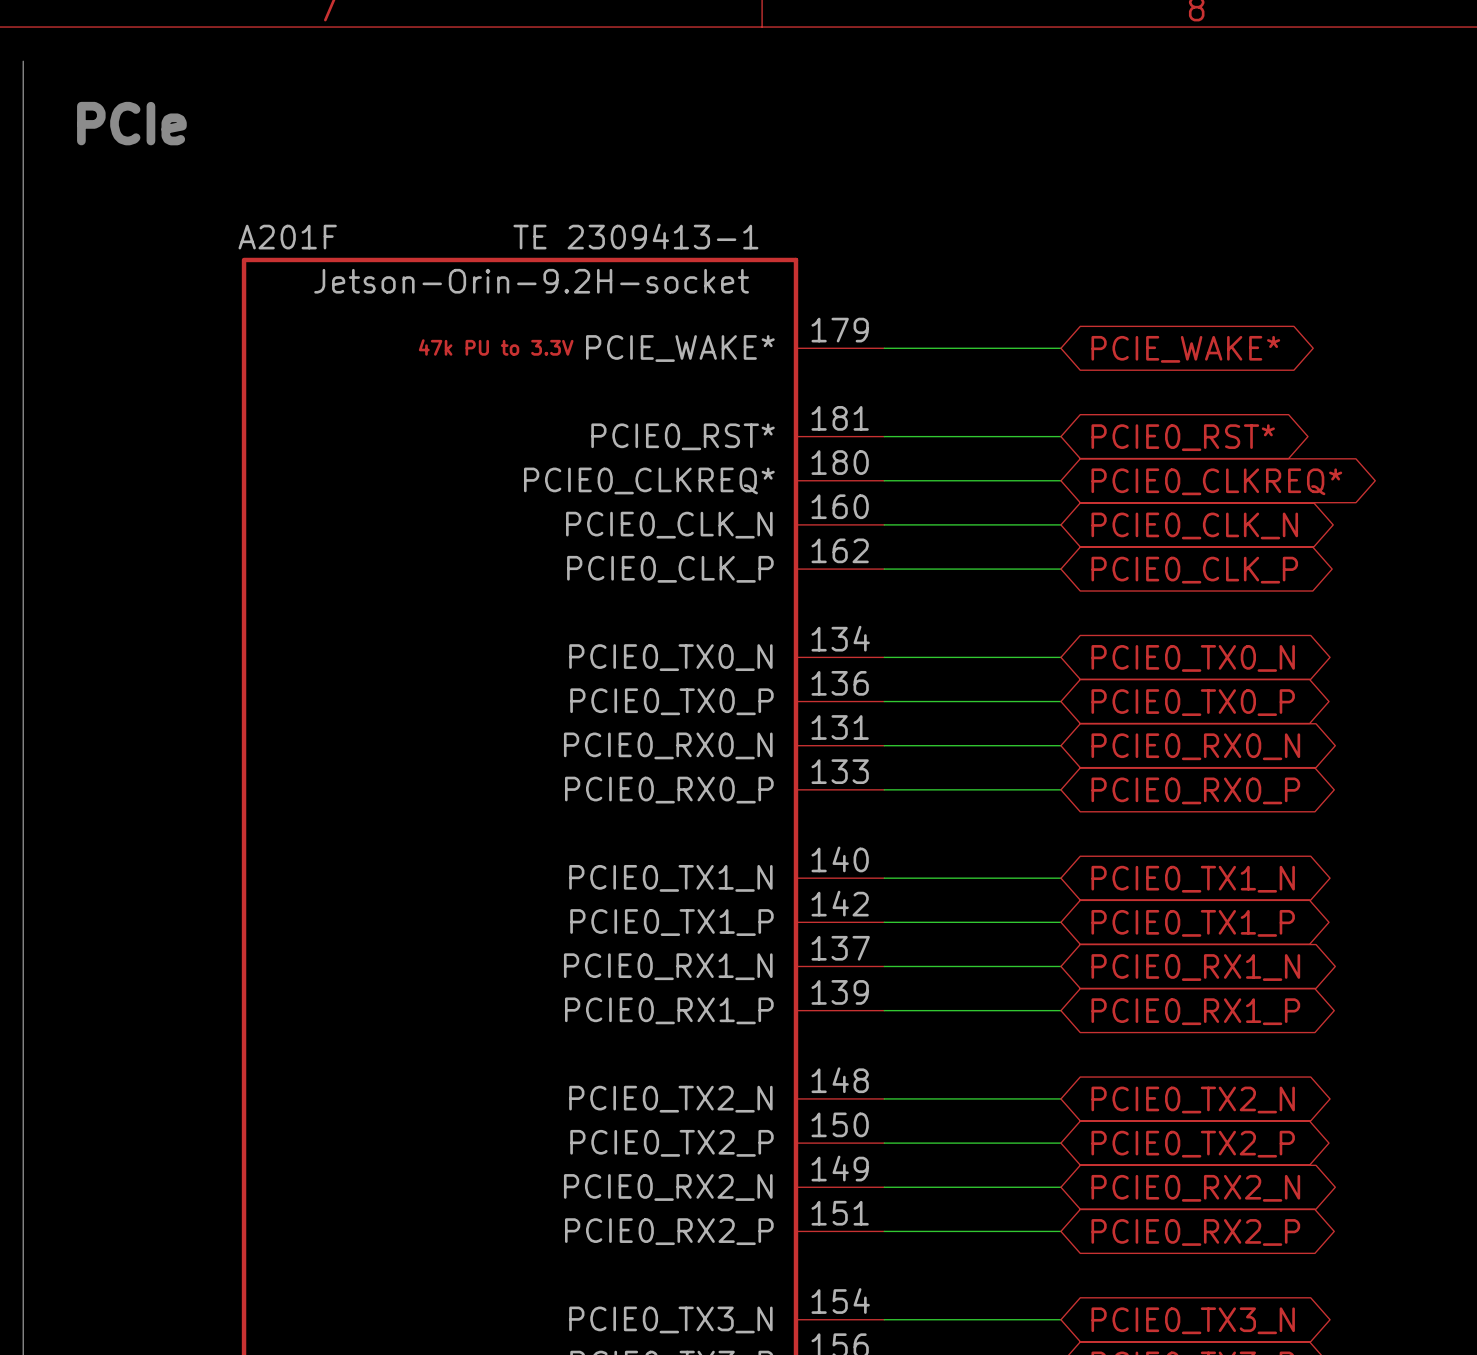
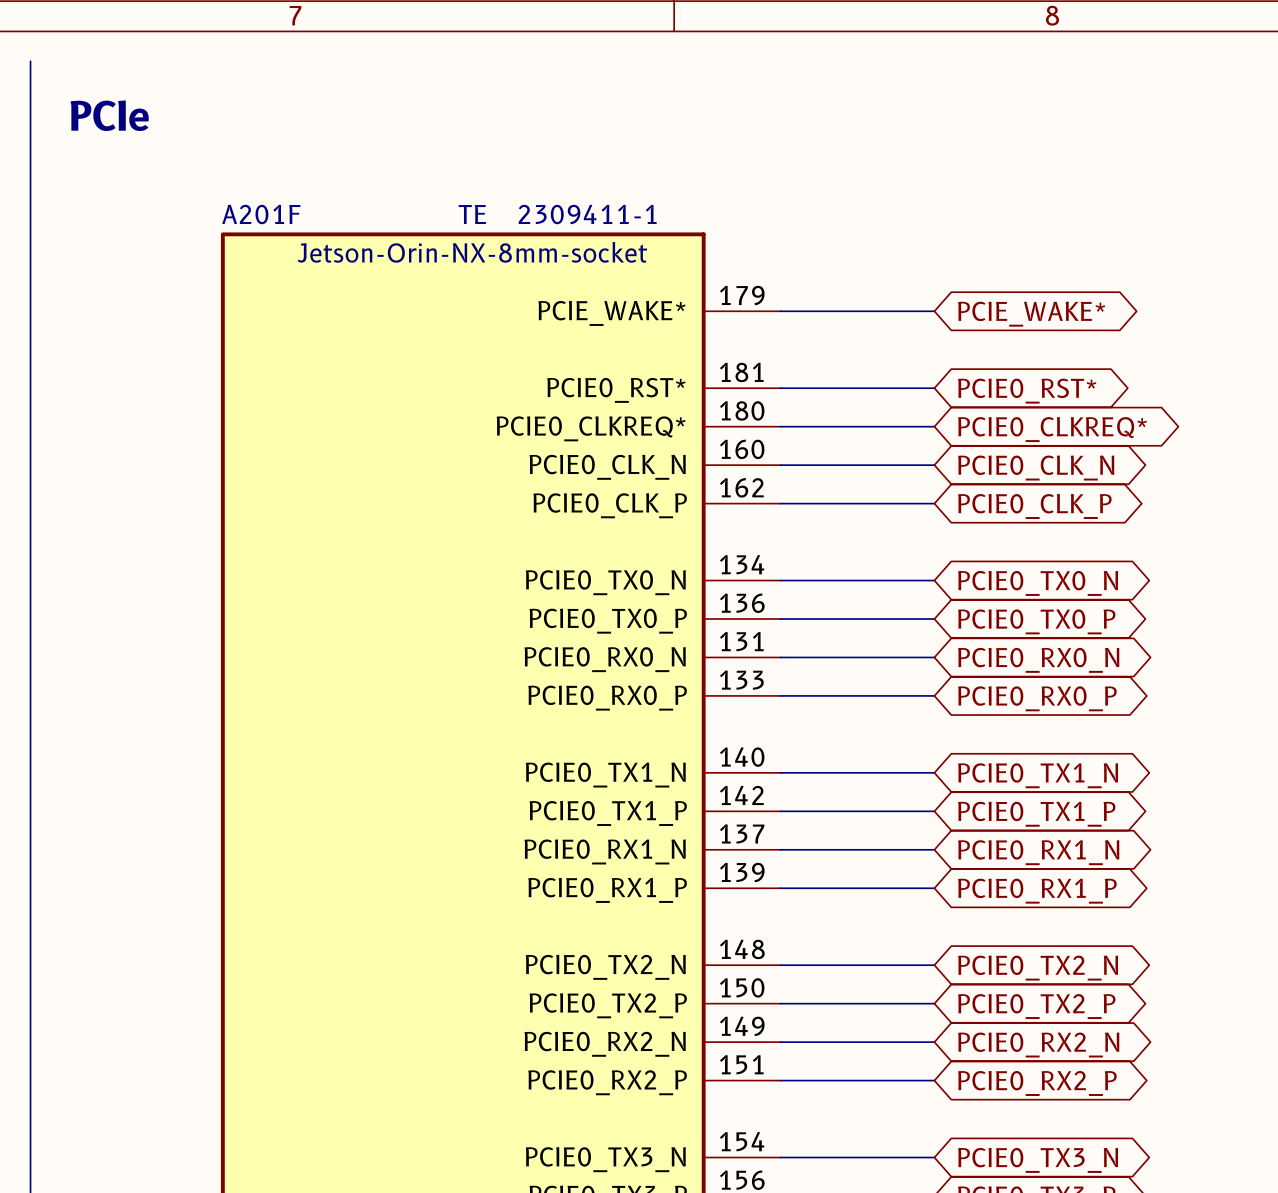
A201F text: 2309413-1 (662, 236) -> 2309411-1 (587, 214)
A201F value: Jetson-Orin-9.2H-socket (531, 281) -> Jetson-Orin-NX-8mm-socket (472, 252)
A201F text: 47k PU to 3.3V (496, 347) -> none

